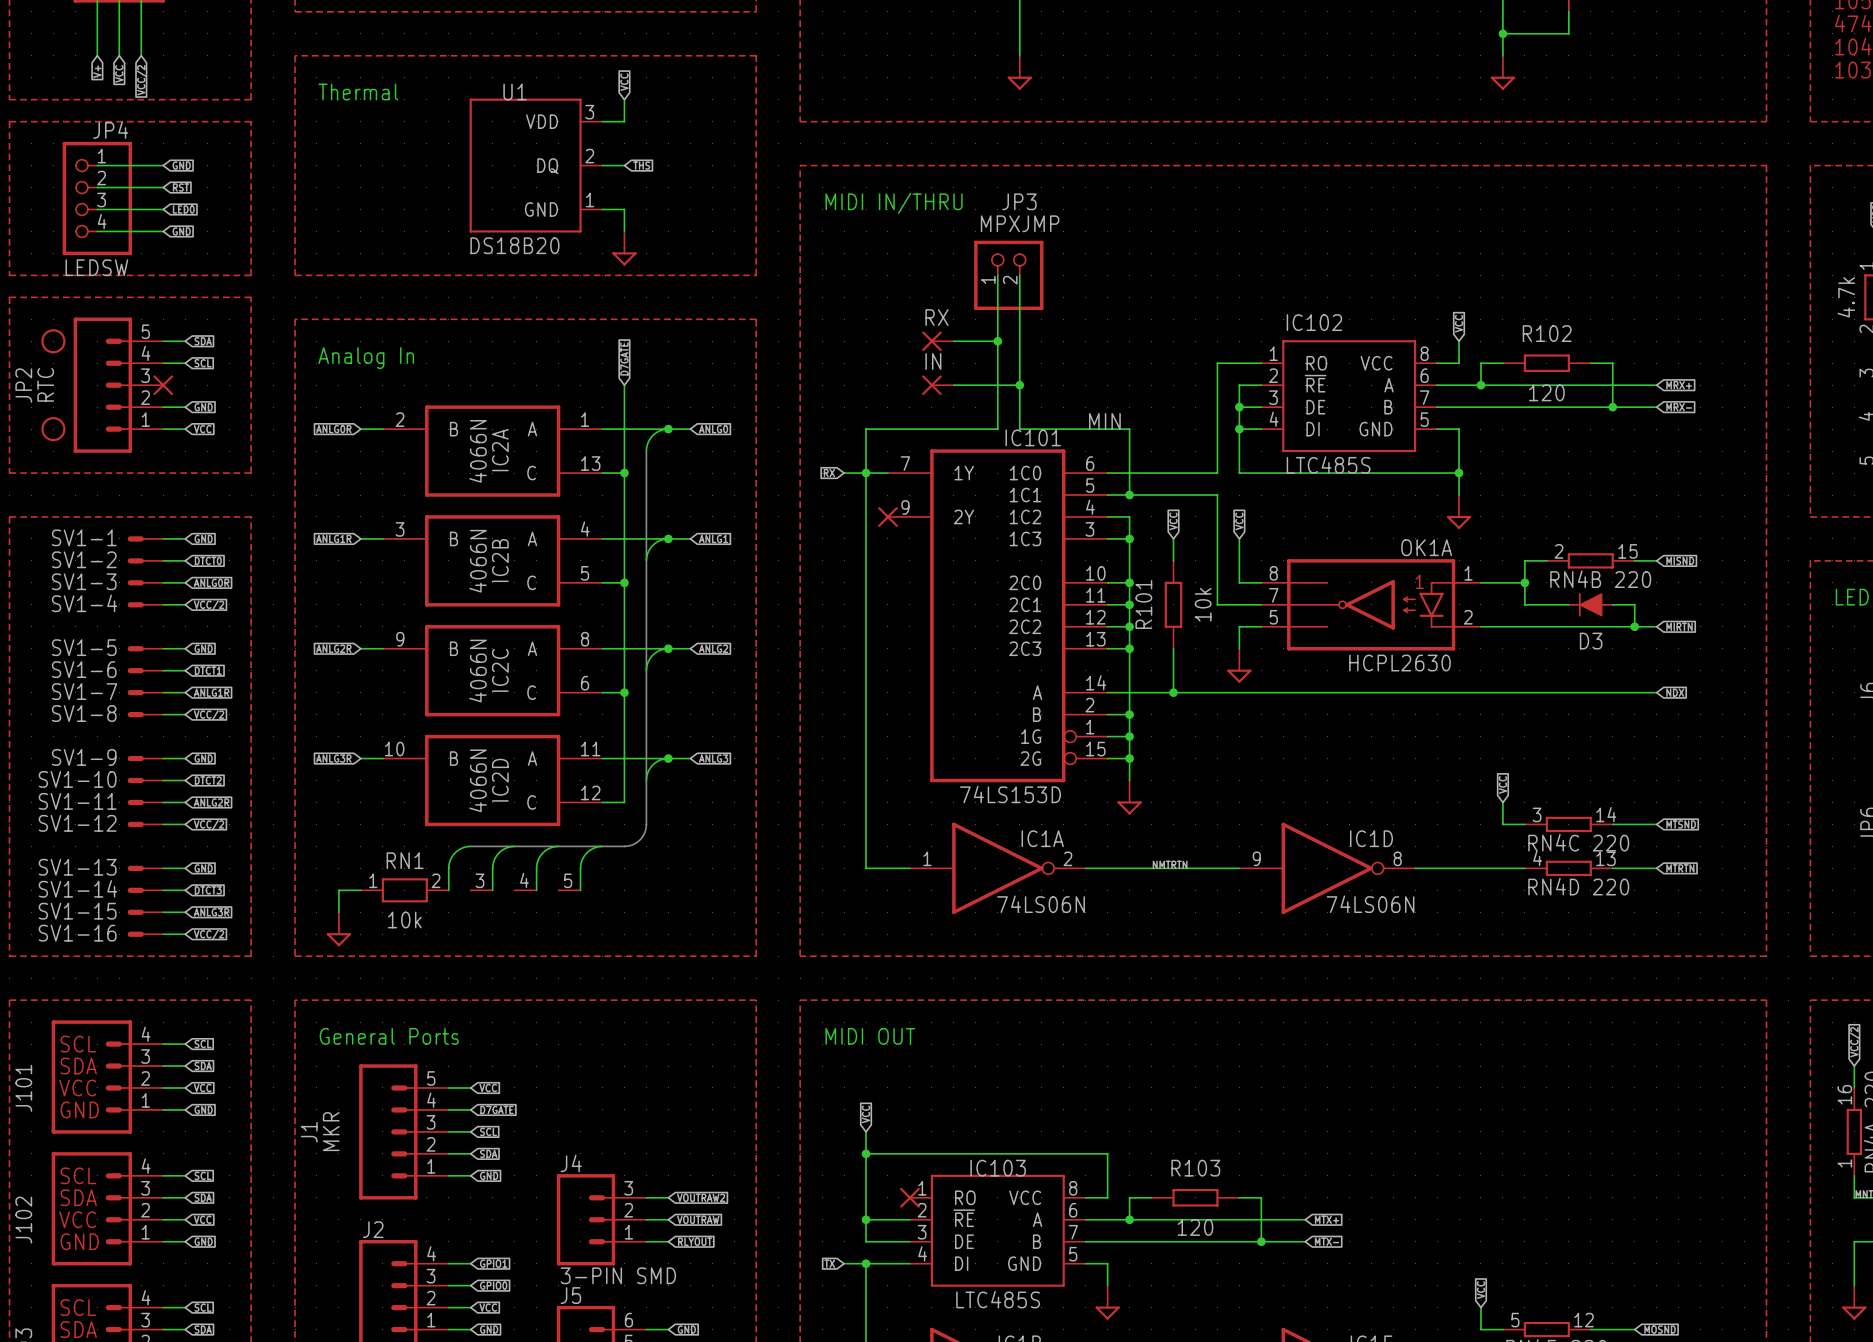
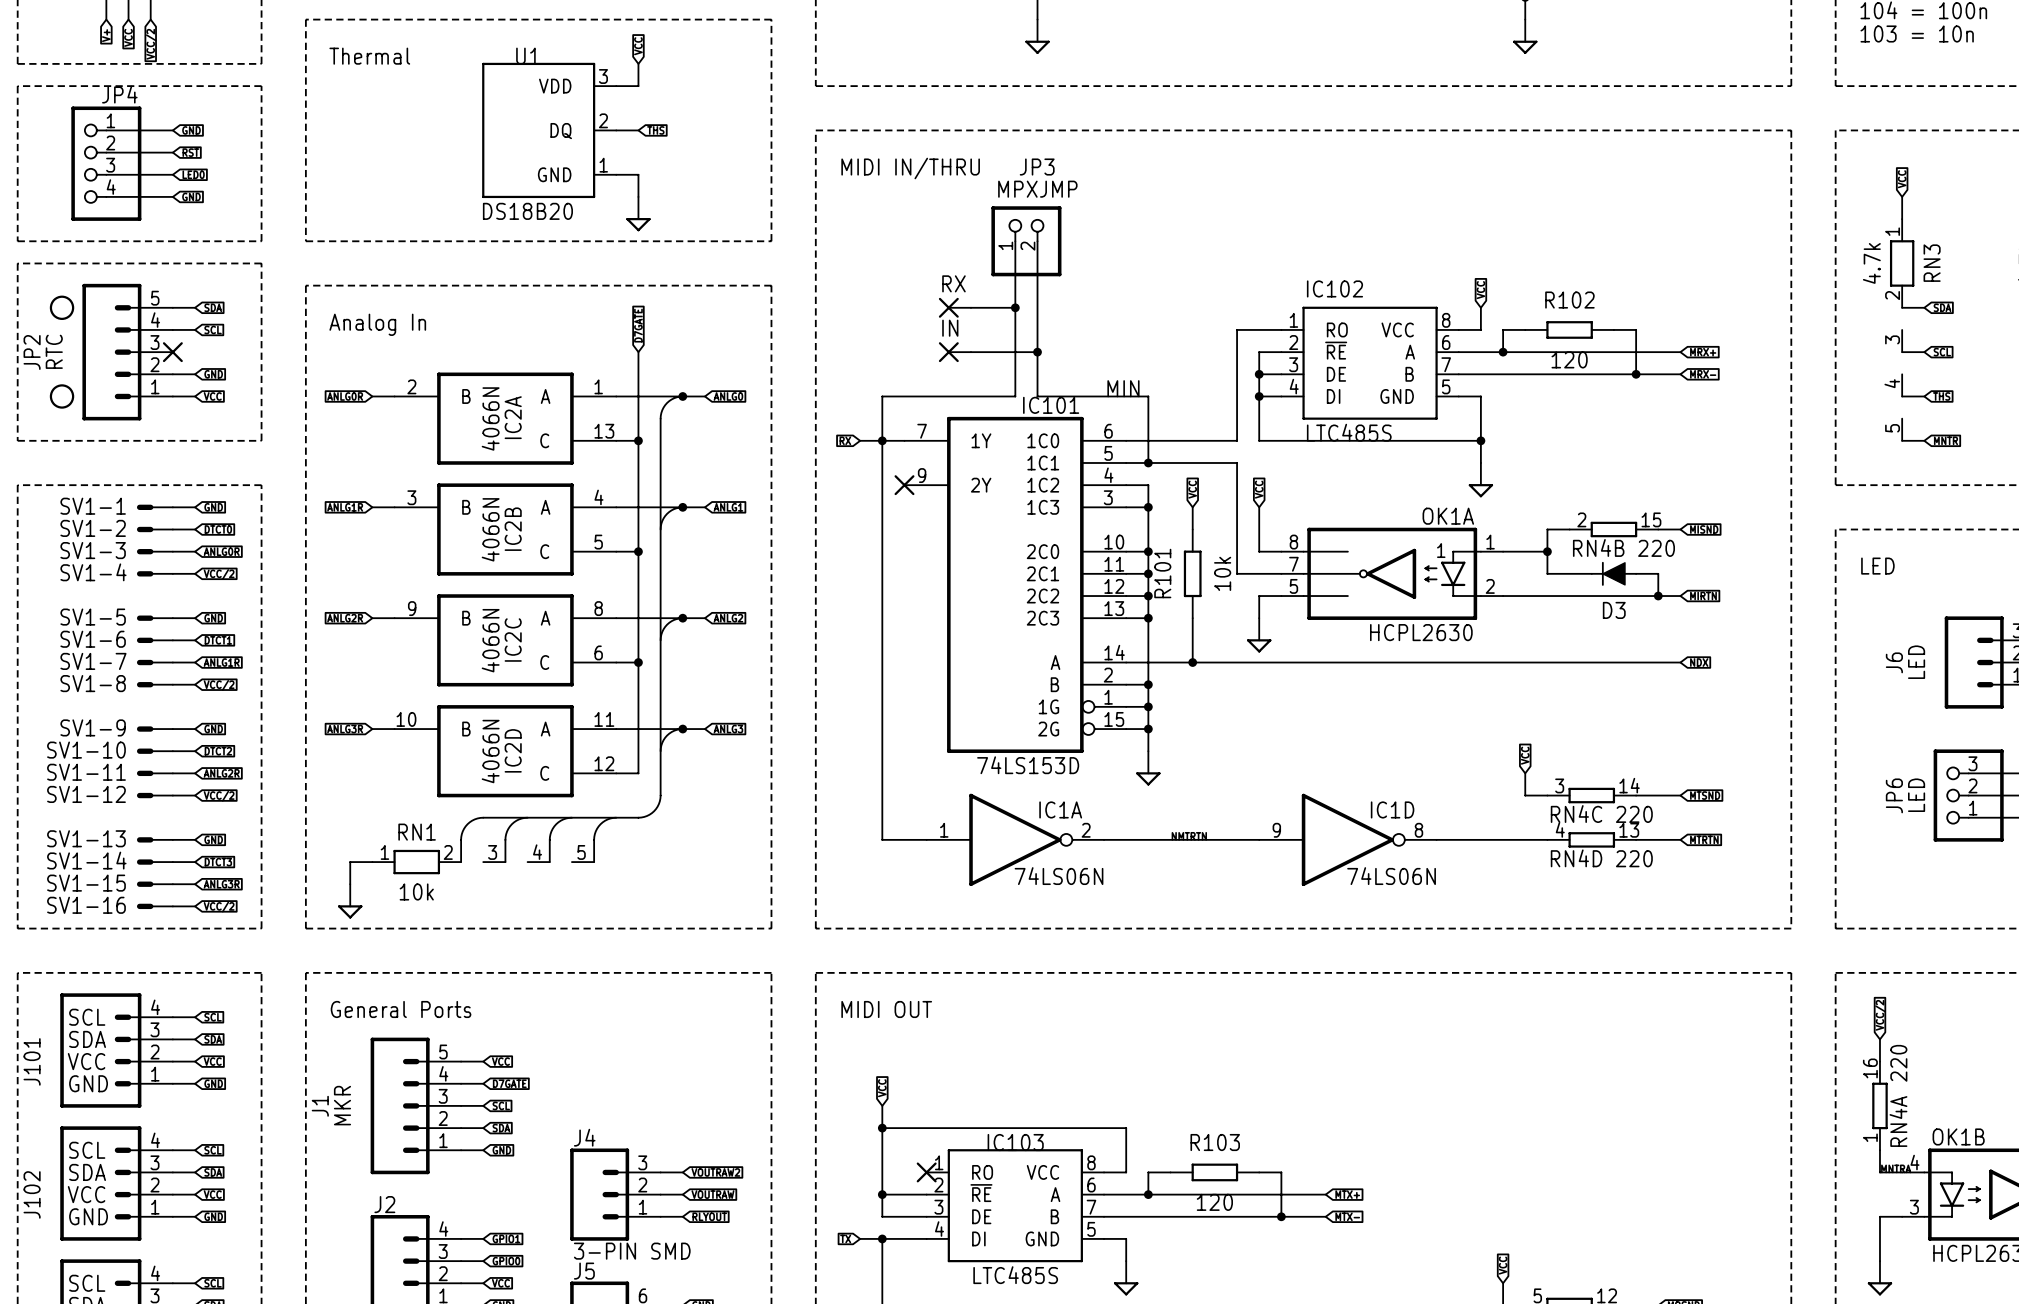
JP4 value: LEDSW (96, 267) -> none

